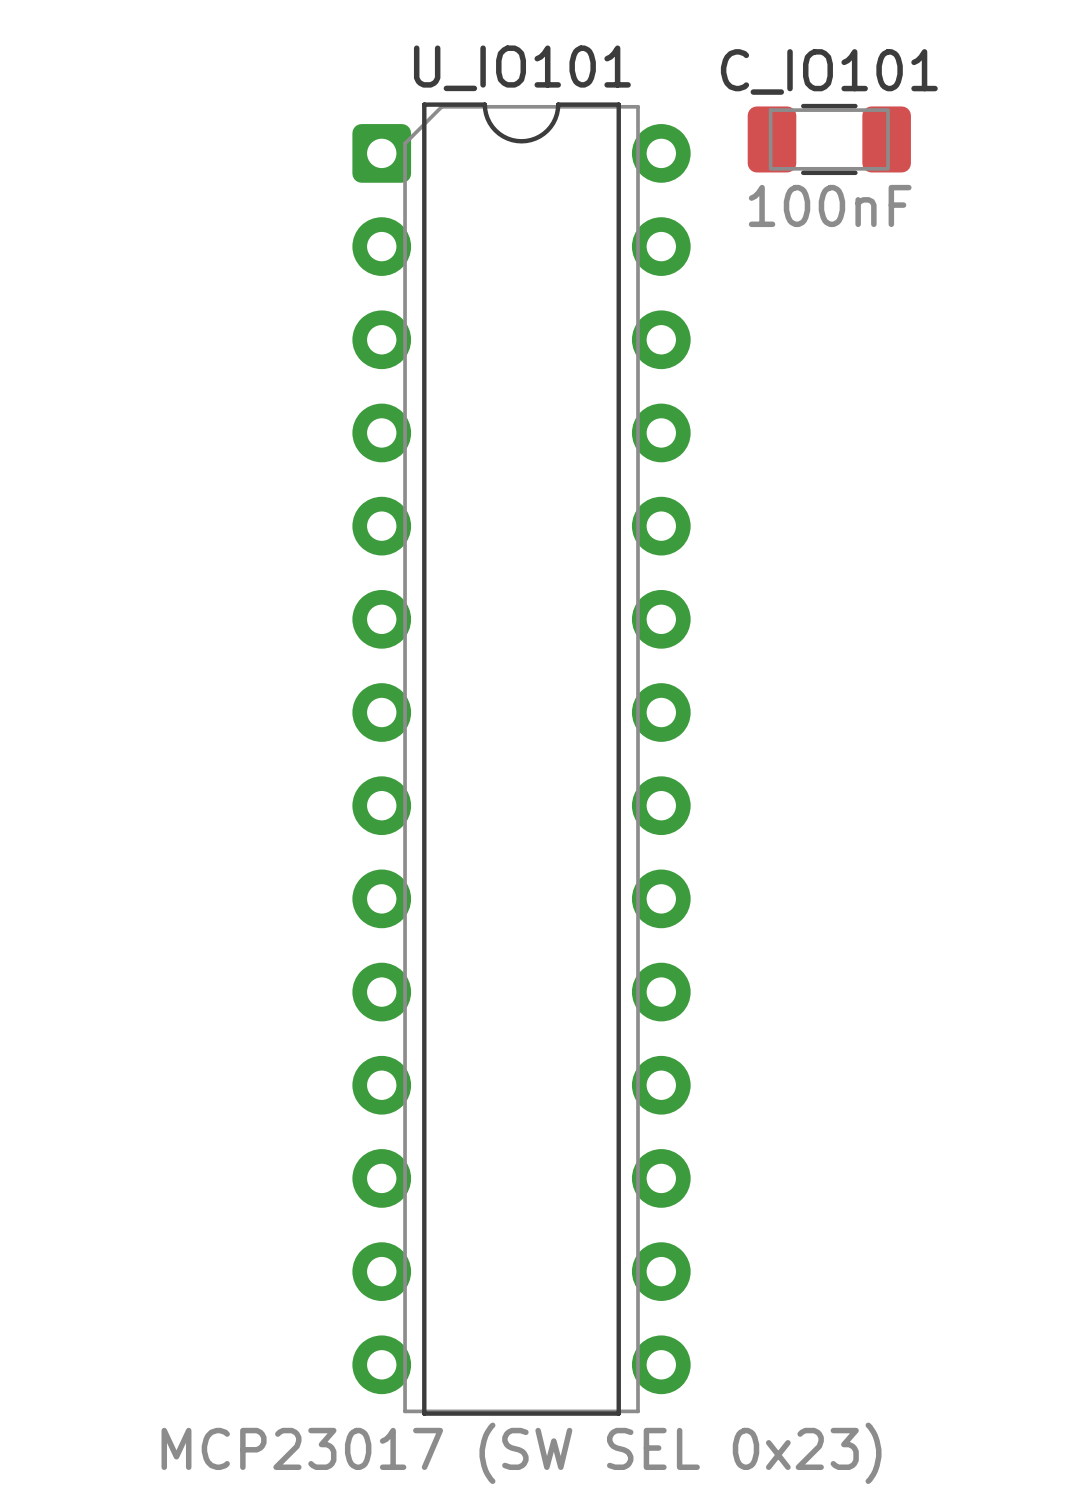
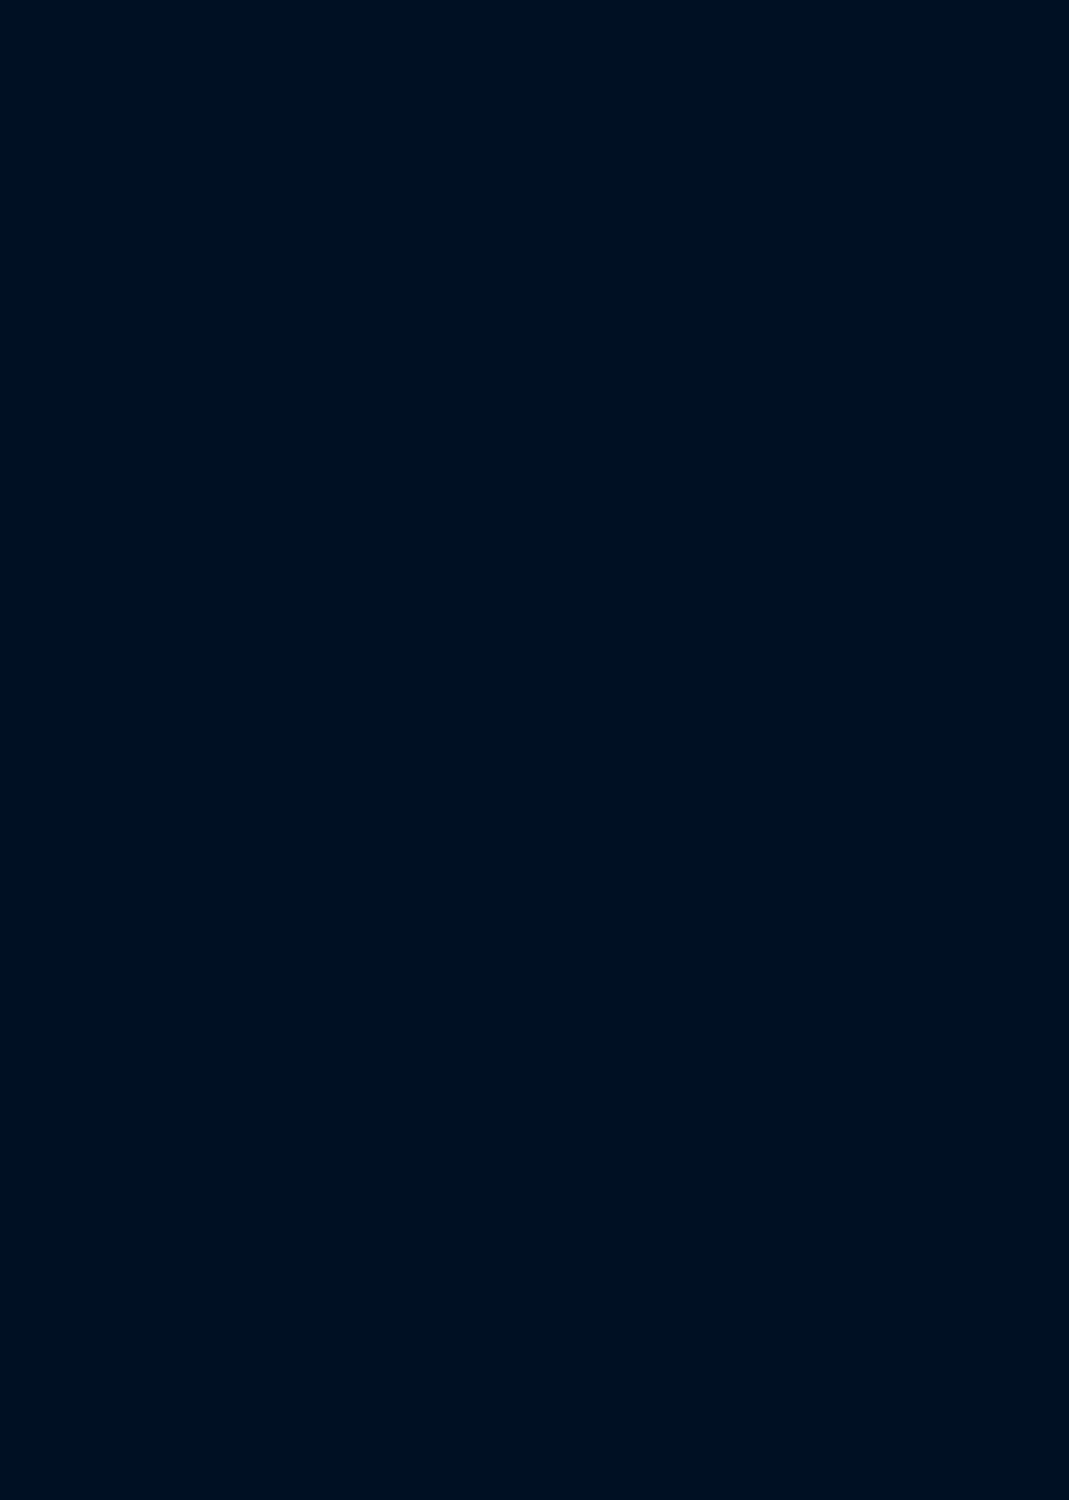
C_IO101: 100nF (829, 139) -> none
U_IO101: MCP23017 (SW SEL 0x23) (521, 759) -> none

